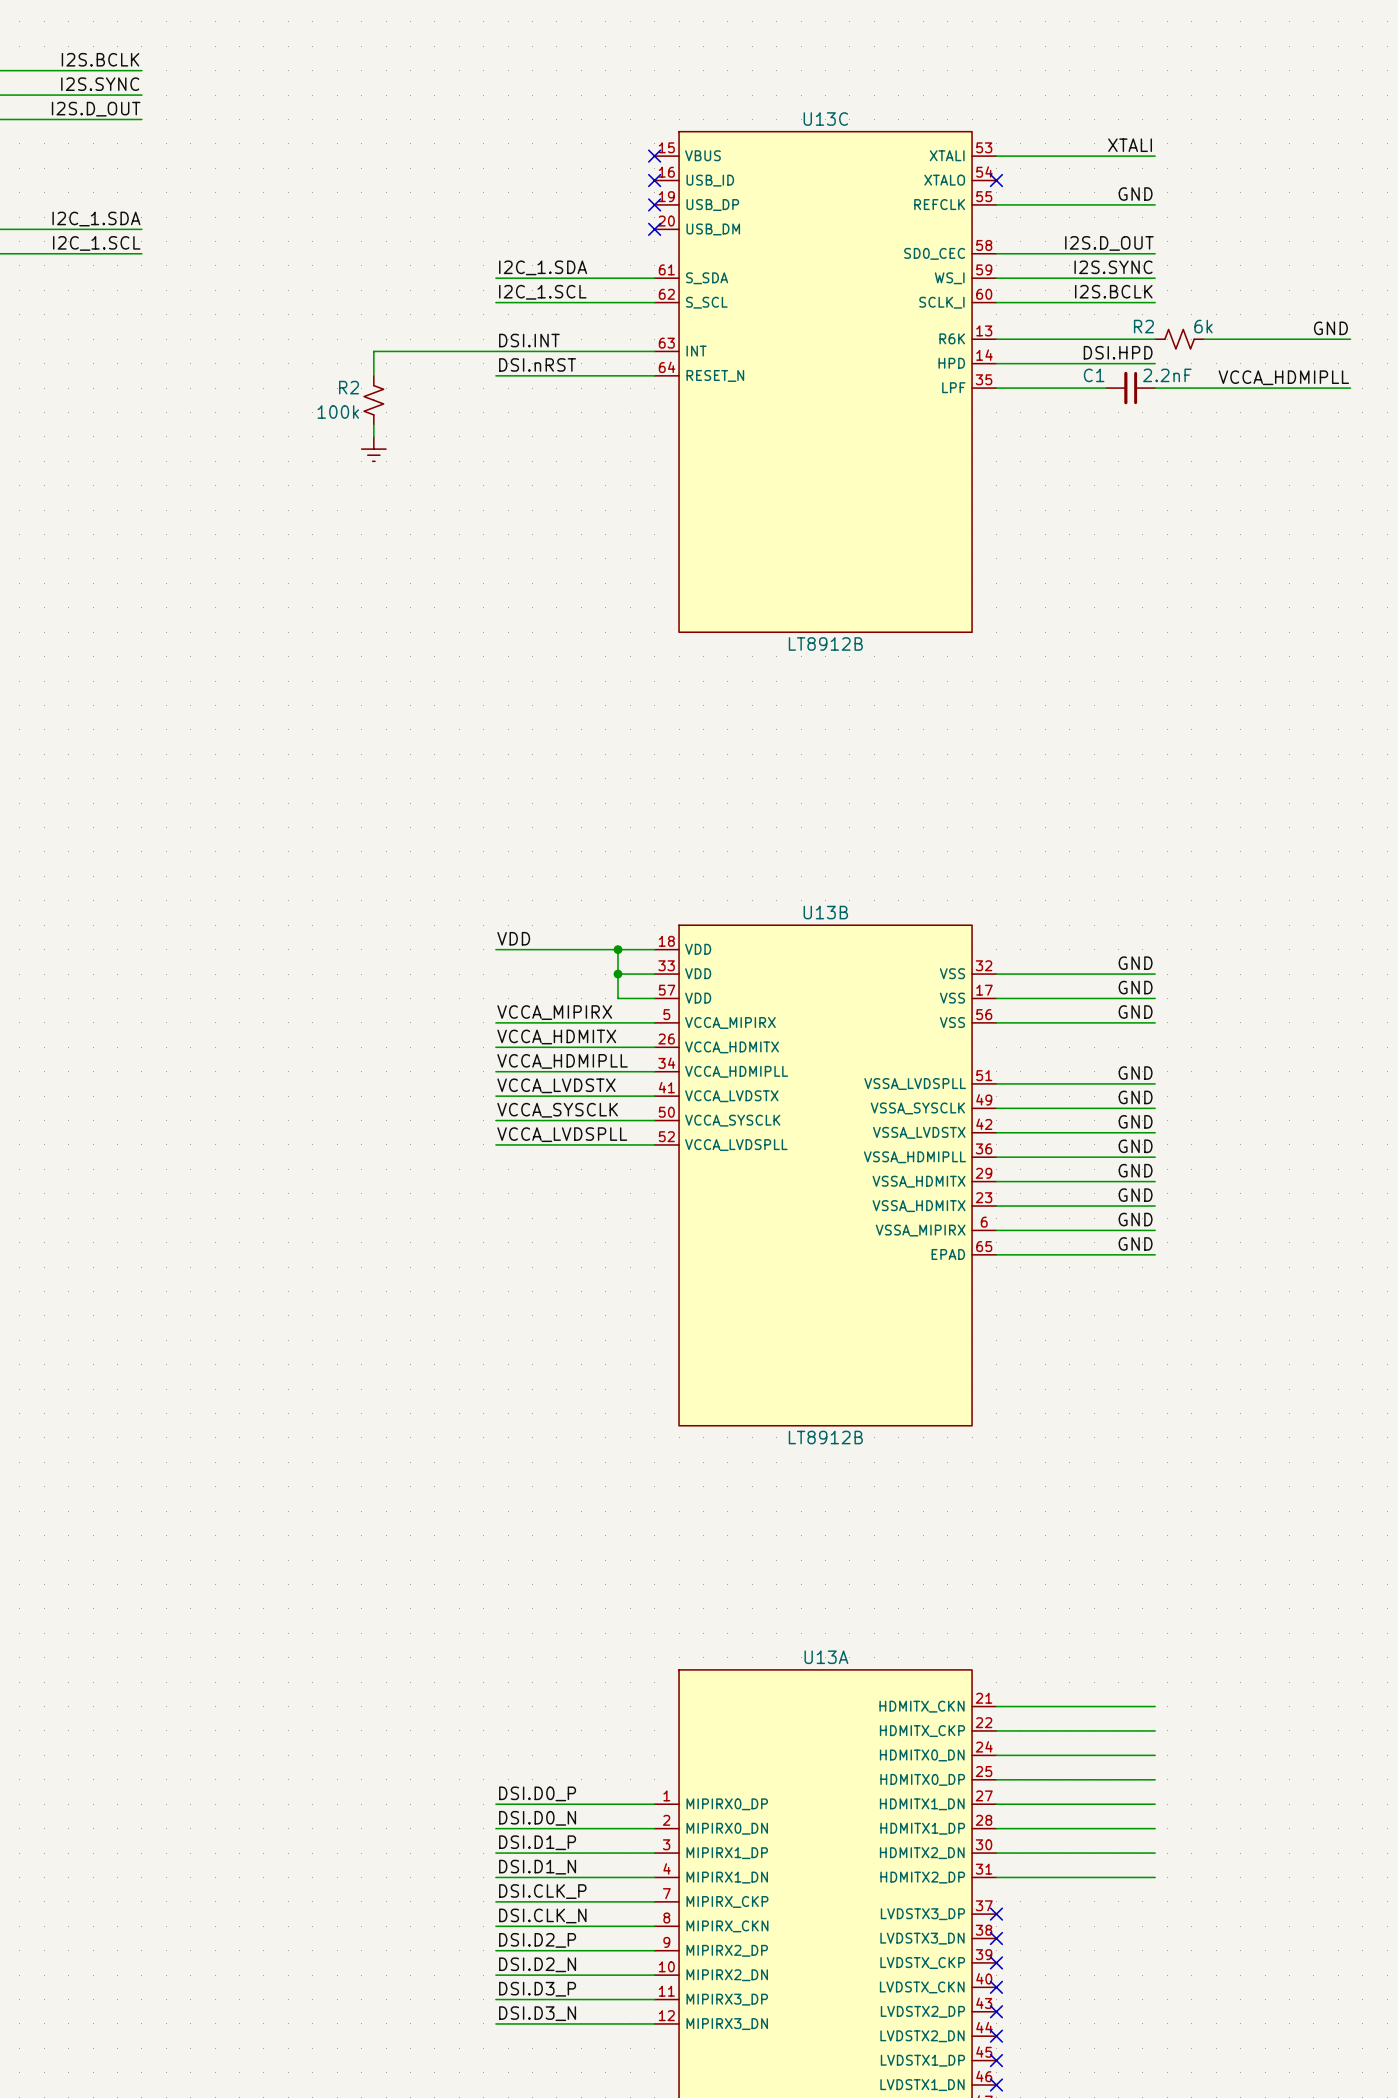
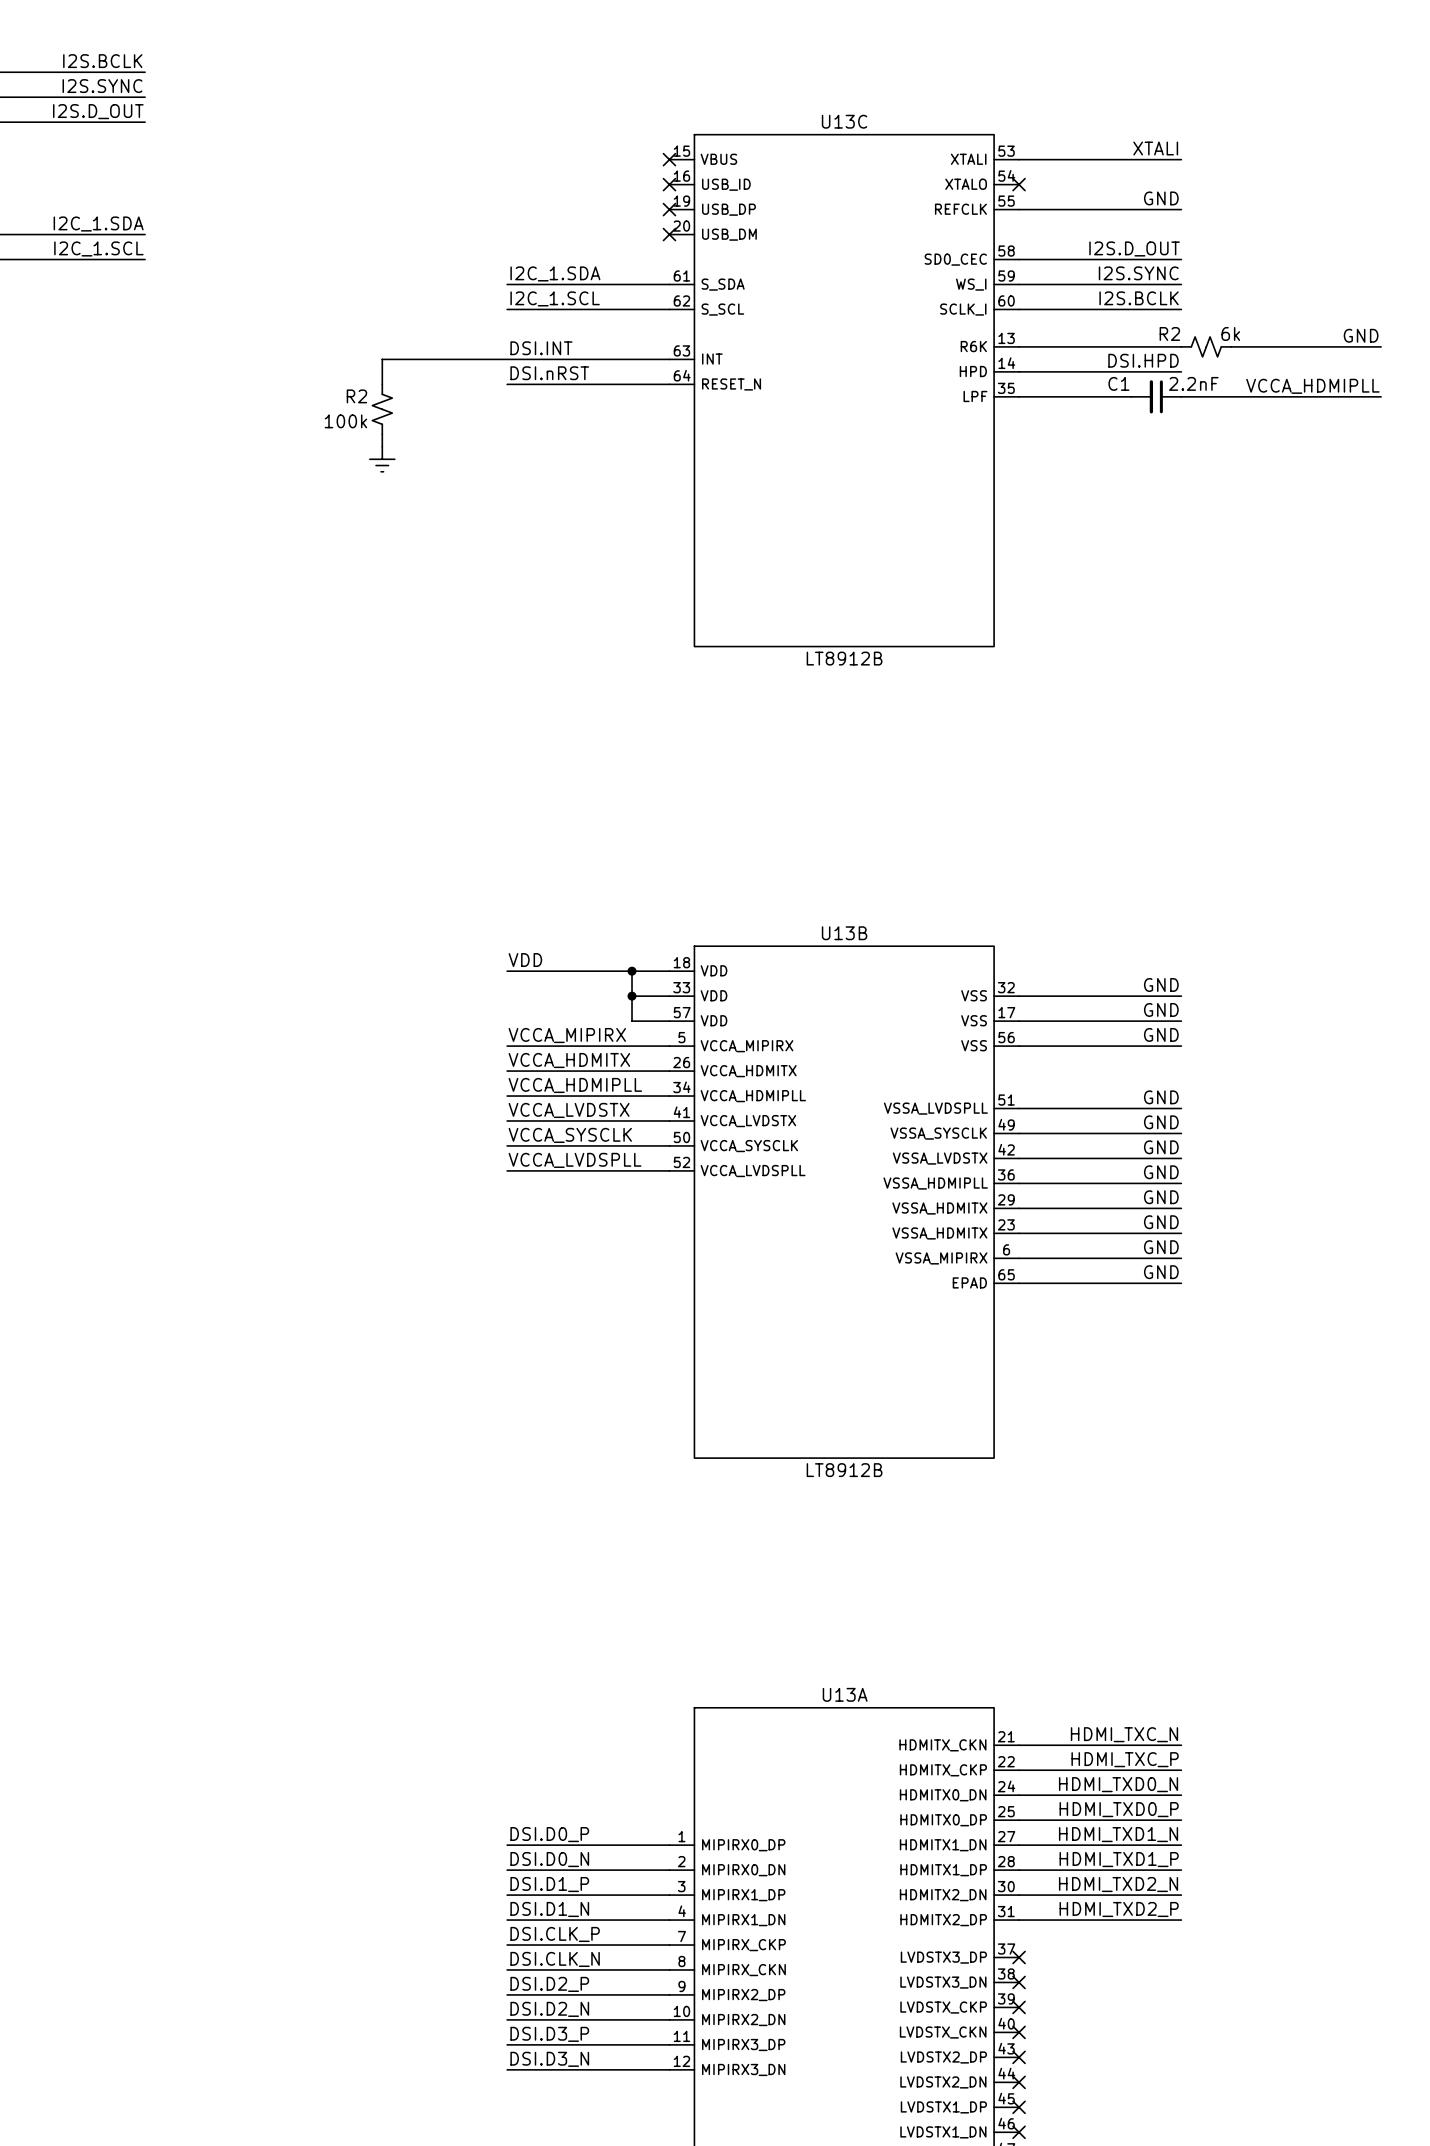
label: none -> HDMI_TXC_N (1124, 1734)
label: none -> HDMI_TXC_P (1125, 1759)
label: none -> HDMI_TXD0_N (1118, 1784)
label: none -> HDMI_TXD0_P (1119, 1809)
label: none -> HDMI_TXD1_N (1118, 1834)
label: none -> HDMI_TXD1_P (1119, 1859)
label: none -> HDMI_TXD2_N (1118, 1884)
label: none -> HDMI_TXD2_P (1119, 1909)

